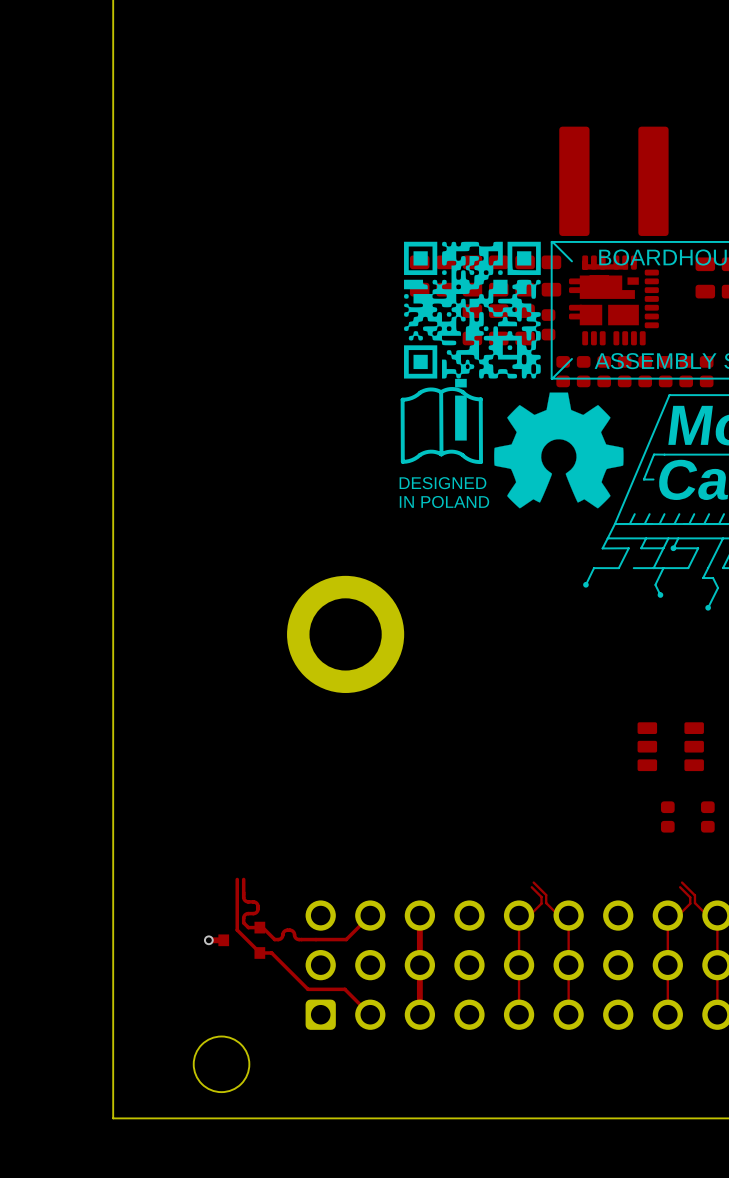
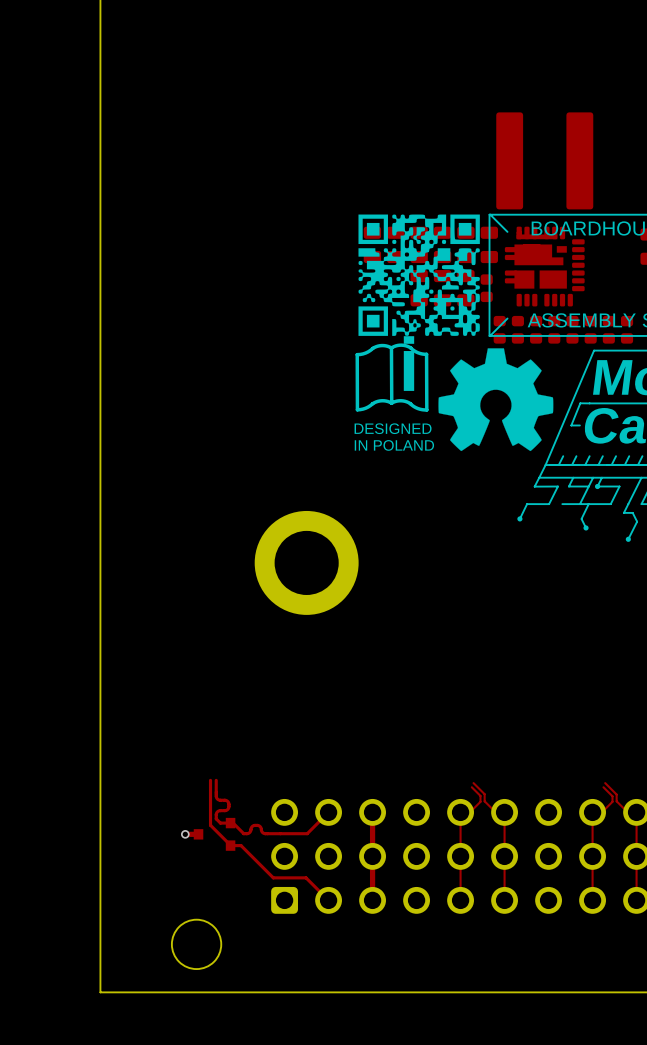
part: (705, 277) -> none
part: (670, 746) -> none
part: (667, 816) -> none
part: (707, 816) -> none

